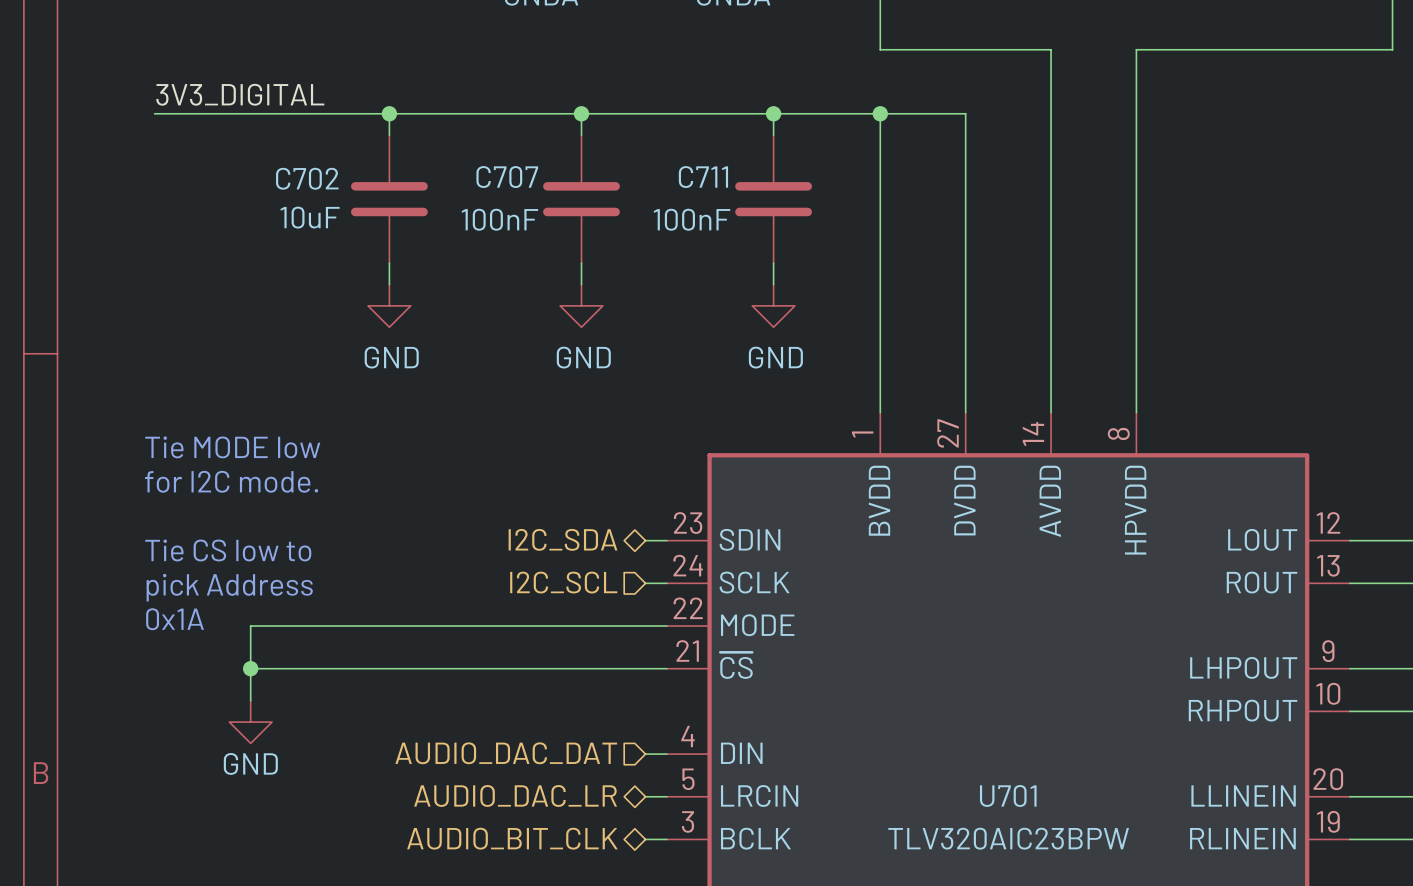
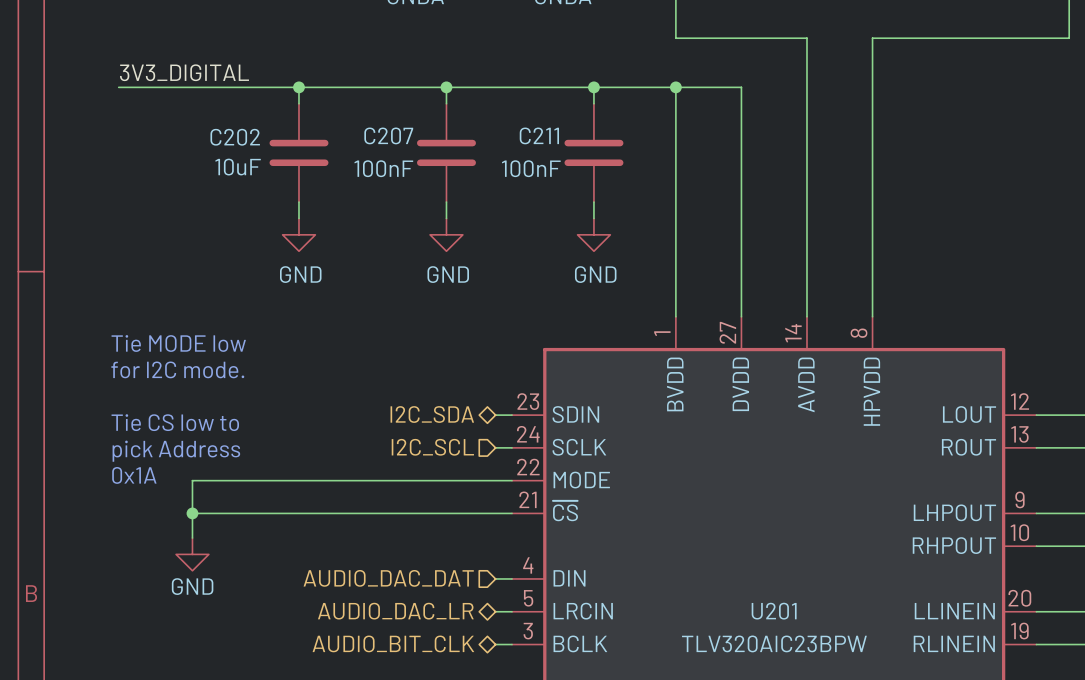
C707 name: C707 (507, 177) -> C207 (388, 135)
C711 name: C711 (703, 177) -> C211 (539, 135)
C702 name: C702 (307, 178) -> C202 (235, 137)
U701 name: U701 (1008, 795) -> U201 (774, 611)

